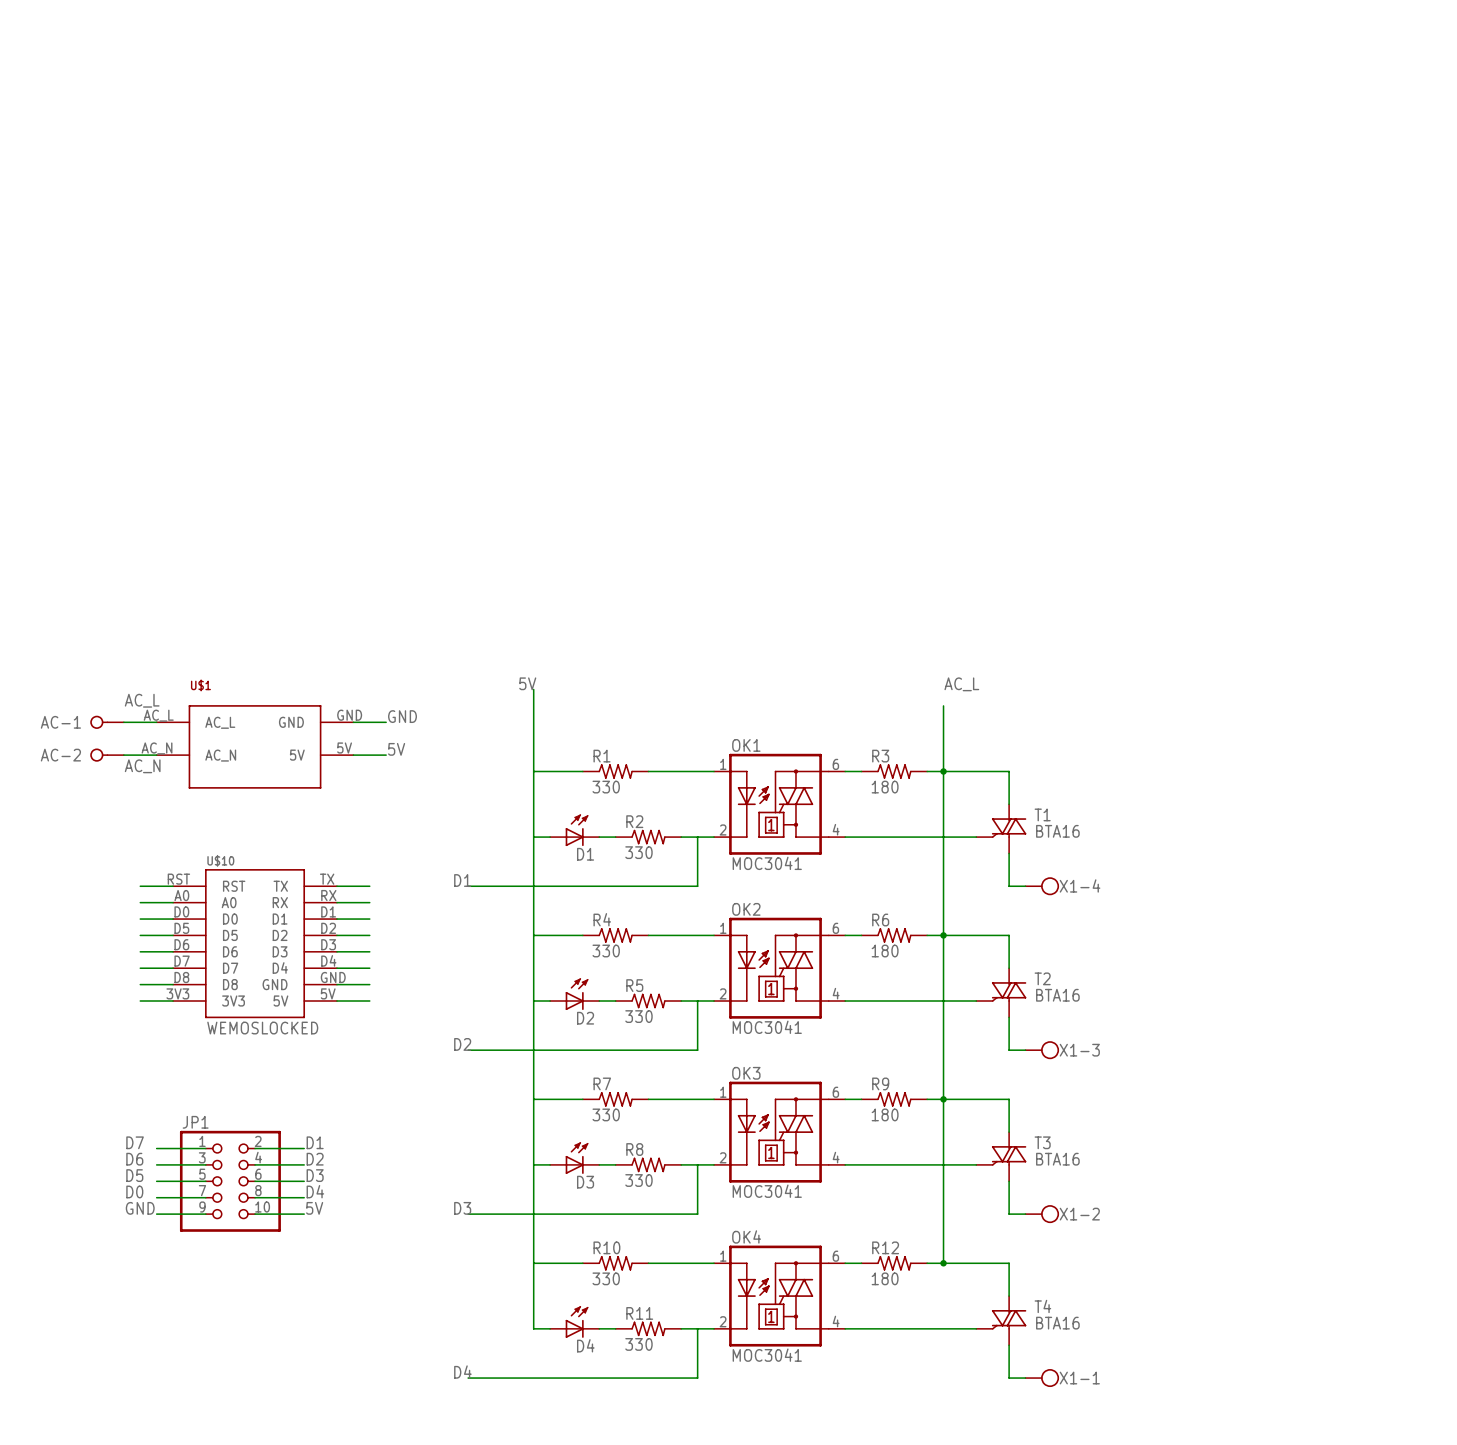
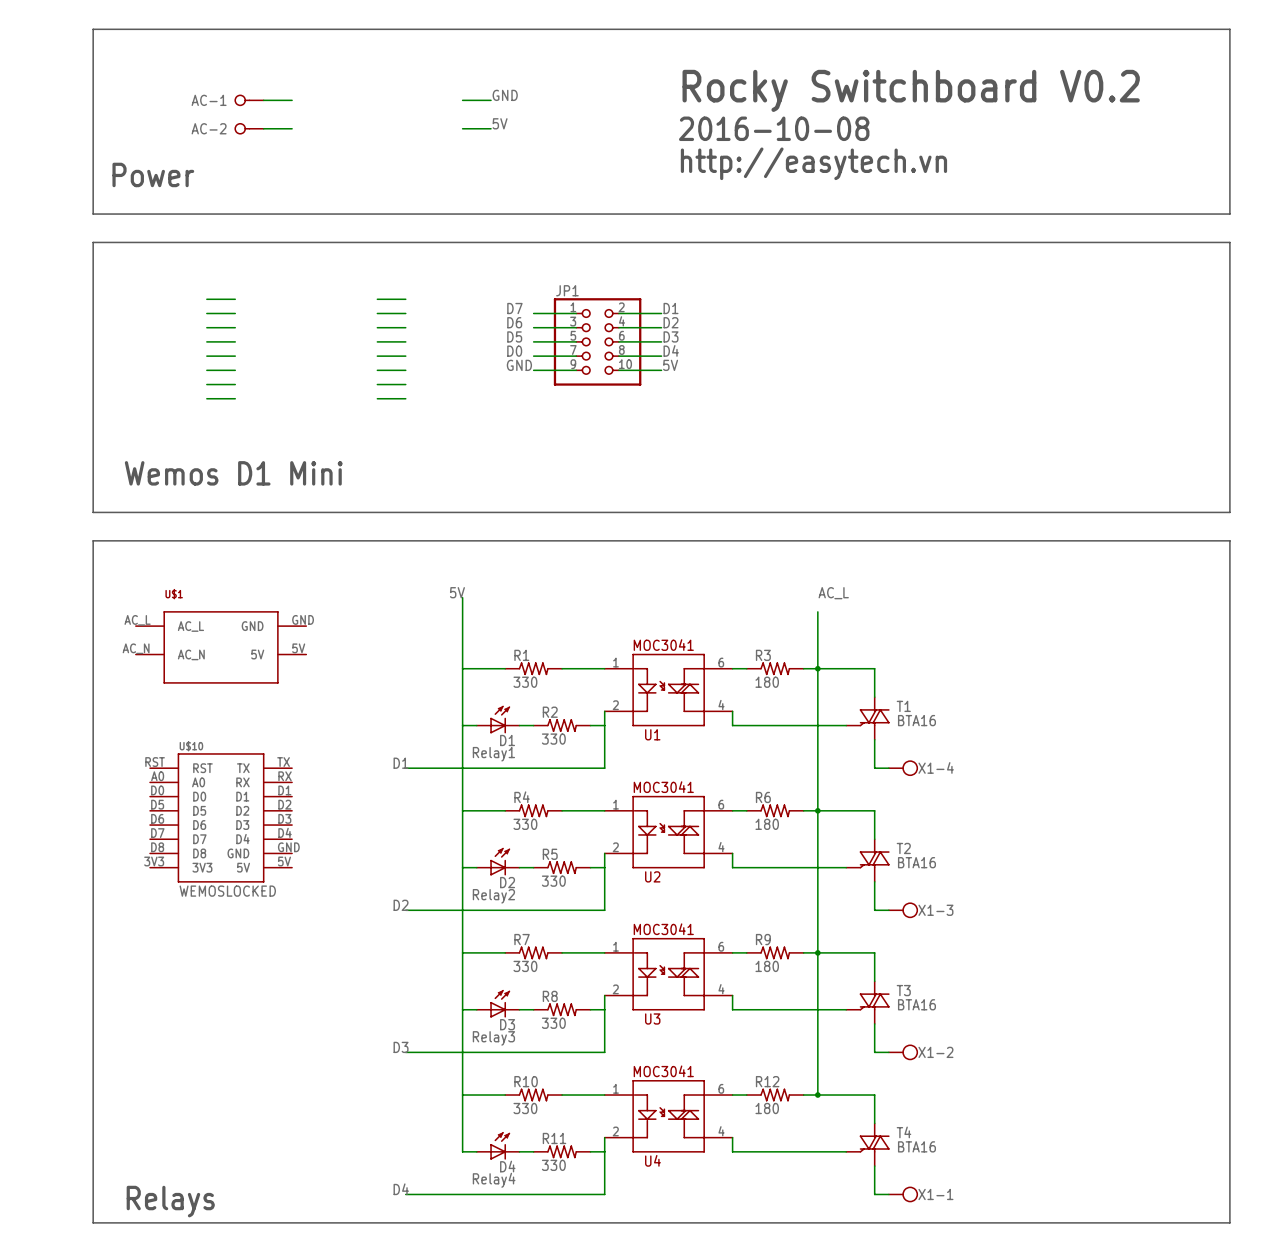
line: none -> (93, 29) (1229, 29) (1229, 214) (93, 214) (93, 29)
text: none -> Rocky Switchboard V0.2 (911, 90)
label: none -> GND (505, 95)
wire: none -> (263, 100) (292, 100)
wire: none -> (462, 100) (491, 100)
label: none -> 5V (500, 123)
wire: none -> (263, 128) (292, 128)
wire: none -> (462, 128) (491, 128)
text: none -> 2016-10-08 (774, 128)
text: none -> http://easytech.vn (813, 163)
text: none -> Power (153, 174)
line: none -> (93, 242) (93, 512) (1229, 512) (1229, 242) (93, 242)
wire: none -> (206, 299) (235, 299)
wire: none -> (377, 299) (405, 299)
label: none -> D7 (514, 308)
label: none -> D1 (671, 308)
wire: none -> (206, 313) (235, 313)
wire: none -> (377, 313) (405, 313)
wire: none -> (533, 313) (576, 313)
wire: none -> (618, 313) (661, 313)
label: none -> D6 (514, 322)
label: none -> D2 (671, 322)
wire: none -> (206, 327) (235, 327)
wire: none -> (377, 327) (405, 327)
wire: none -> (533, 327) (576, 327)
wire: none -> (618, 327) (661, 327)
label: none -> D5 (514, 336)
label: none -> D3 (671, 336)
wire: none -> (206, 341) (235, 341)
wire: none -> (377, 341) (405, 341)
wire: none -> (533, 341) (576, 341)
wire: none -> (618, 341) (661, 341)
label: none -> D4 (671, 350)
label: none -> D0 (514, 351)
wire: none -> (206, 356) (235, 356)
wire: none -> (377, 356) (405, 356)
wire: none -> (533, 356) (576, 356)
wire: none -> (618, 356) (661, 356)
label: none -> GND (519, 365)
label: none -> 5V (670, 365)
wire: none -> (206, 370) (235, 370)
wire: none -> (377, 370) (405, 370)
wire: none -> (533, 370) (576, 370)
wire: none -> (618, 370) (661, 370)
wire: none -> (206, 384) (235, 384)
wire: none -> (377, 384) (405, 384)
wire: none -> (206, 398) (235, 398)
wire: none -> (377, 398) (405, 398)
text: none -> Wemos D1 Mini (233, 473)
line: none -> (93, 540) (93, 1222) (1229, 1222) (1229, 540) (93, 540)
label: AC_L (142, 700) -> none
label: GND (402, 716) -> none
AC-1 position: (107, 722) -> (249, 100)
wire: (123, 722) (156, 722) -> none
wire: (353, 722) (386, 722) -> none
label: 5V (396, 749) -> none
AC-2 position: (107, 755) -> (249, 128)
wire: (123, 755) (156, 755) -> none
wire: (353, 755) (386, 755) -> none
label: AC_N (142, 766) -> none
U1: none -> (668, 690)
OK1: MOC3041 (779, 804) -> none
wire: none -> (732, 711) (732, 725)
wire: (697, 837) (714, 837) -> (604, 725) (604, 711)
D1 value: none -> Relay1 (493, 754)
wire: (140, 886) (173, 886) -> none
wire: (336, 886) (369, 886) -> none
wire: (140, 902) (173, 902) -> none
wire: (336, 902) (369, 902) -> none
wire: (140, 919) (173, 919) -> none
wire: (336, 919) (369, 919) -> none
wire: (140, 935) (173, 935) -> none
wire: (336, 935) (369, 935) -> none
wire: (140, 951) (173, 951) -> none
wire: (336, 951) (369, 951) -> none
U2: none -> (668, 832)
wire: (140, 968) (173, 968) -> none
wire: (336, 968) (369, 968) -> none
OK2: MOC3041 (779, 968) -> none
wire: (140, 984) (173, 984) -> none
wire: (336, 984) (369, 984) -> none
wire: none -> (732, 853) (732, 867)
wire: (140, 1001) (173, 1001) -> none
wire: (336, 1001) (369, 1001) -> none
wire: (697, 1001) (714, 1001) -> (604, 867) (604, 853)
D2 value: none -> Relay2 (493, 896)
U3: none -> (668, 974)
OK3: MOC3041 (779, 1132) -> none
label: D7 (135, 1142) -> none
label: D1 (315, 1142) -> none
wire: (156, 1148) (205, 1148) -> none
wire: (255, 1148) (304, 1148) -> none
wire: none -> (732, 995) (732, 1009)
label: D6 (134, 1159) -> none
label: D2 (315, 1159) -> none
wire: (156, 1164) (205, 1164) -> none
wire: (255, 1164) (304, 1164) -> none
wire: (697, 1164) (714, 1164) -> (604, 1009) (604, 995)
label: D5 (134, 1175) -> none
label: D3 (315, 1175) -> none
wire: (156, 1181) (205, 1181) -> none
JP1 position: (230, 1181) -> (597, 341)
wire: (255, 1181) (304, 1181) -> none
label: D0 (134, 1191) -> none
label: D4 (315, 1191) -> none
wire: (156, 1197) (205, 1197) -> none
wire: (255, 1197) (304, 1197) -> none
D3 value: none -> Relay3 (493, 1038)
label: GND (140, 1208) -> none
label: 5V (314, 1208) -> none
wire: (156, 1214) (205, 1214) -> none
wire: (255, 1214) (304, 1214) -> none
U4: none -> (668, 1116)
OK4: MOC3041 (779, 1296) -> none
wire: none -> (732, 1137) (732, 1151)
wire: (697, 1328) (714, 1328) -> (604, 1151) (604, 1137)
D4 value: none -> Relay4 (494, 1180)
text: none -> Relays (170, 1201)

